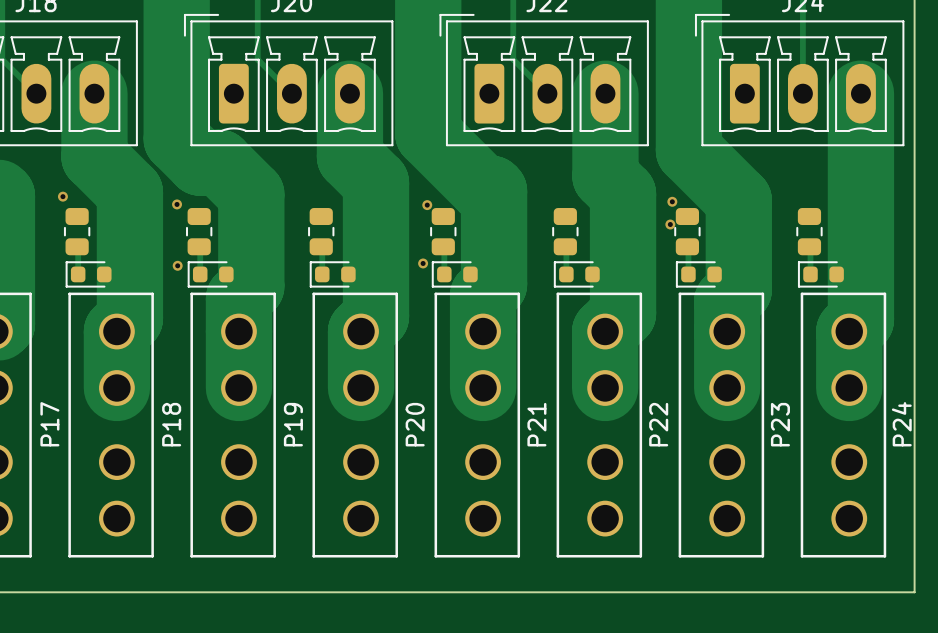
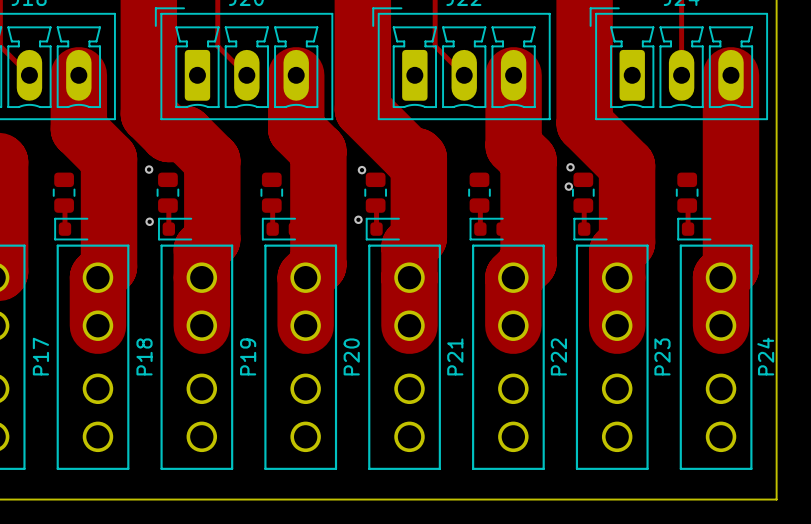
via: (62, 196) -> none

